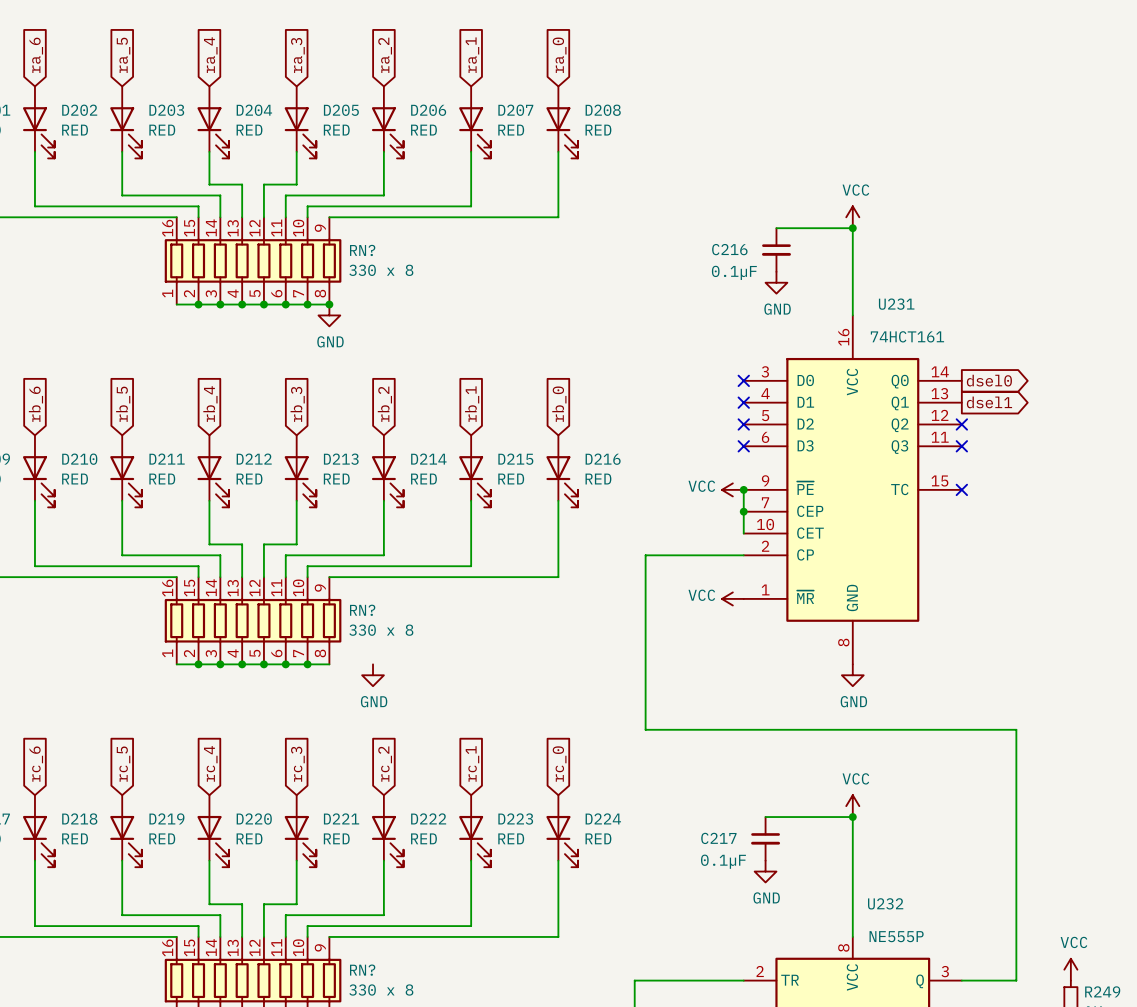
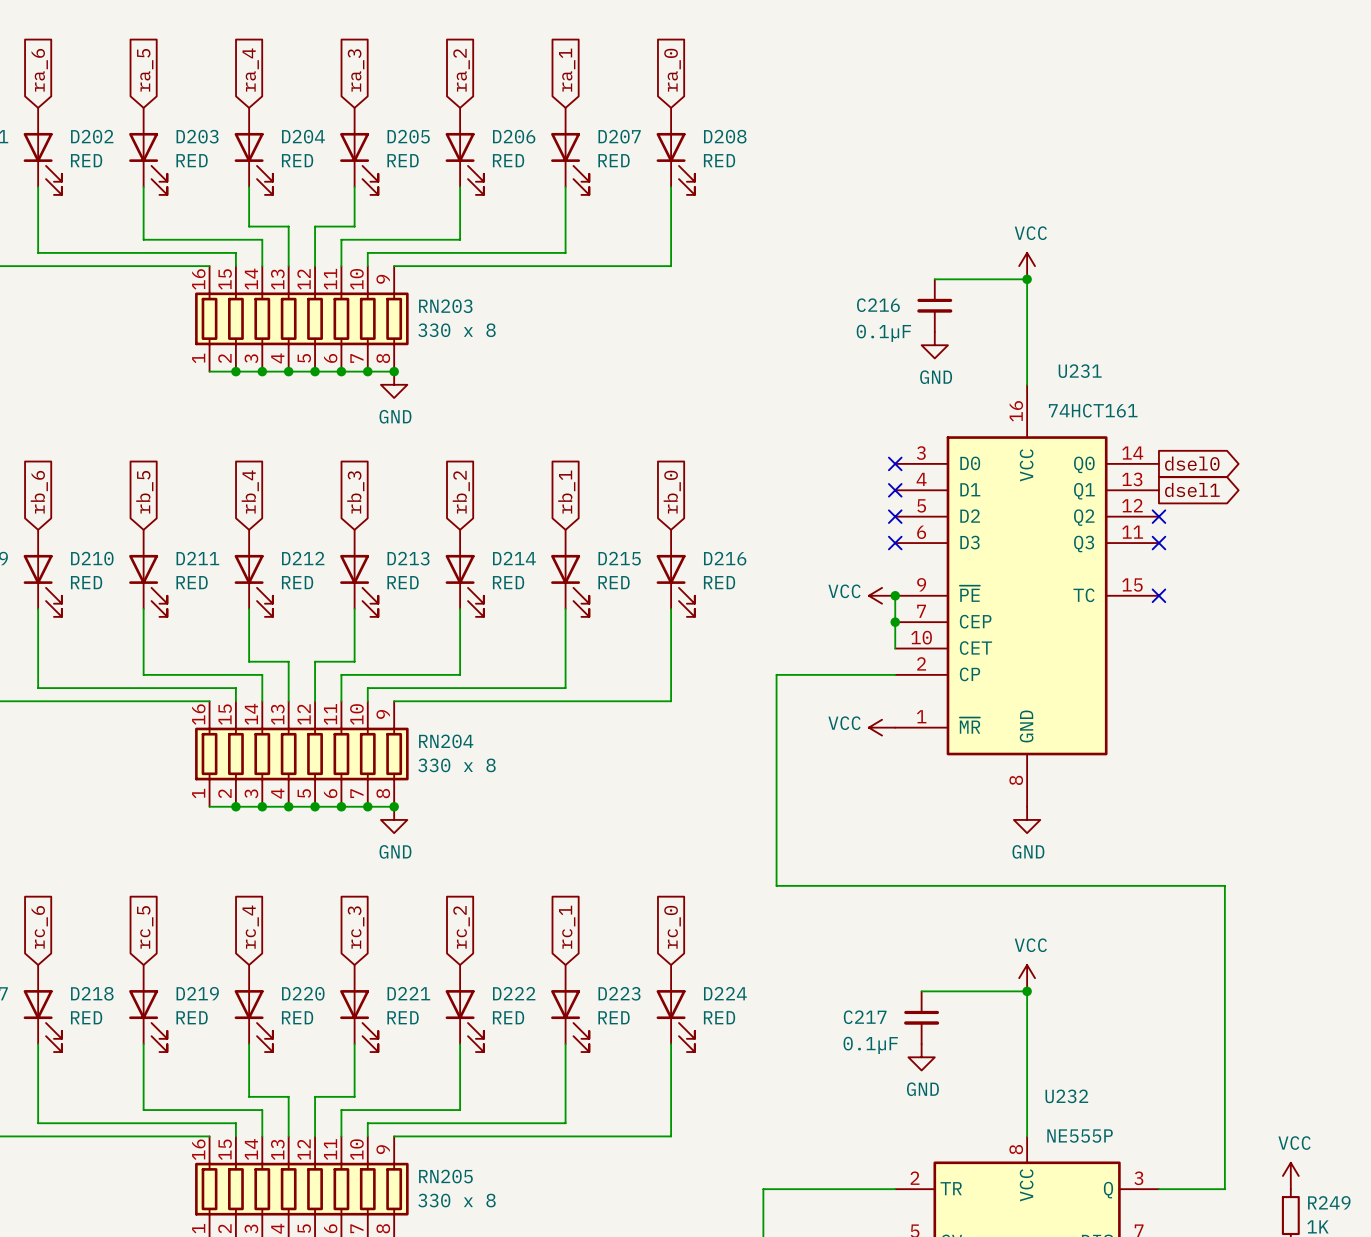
RN? name: RN? (362, 250) -> RN203 (445, 306)
RN? name: RN? (362, 610) -> RN204 (446, 741)
junction: none -> (394, 806)
power symbol position: GND (373, 675) -> GND (394, 819)
RN? name: RN? (362, 970) -> RN205 (445, 1176)

